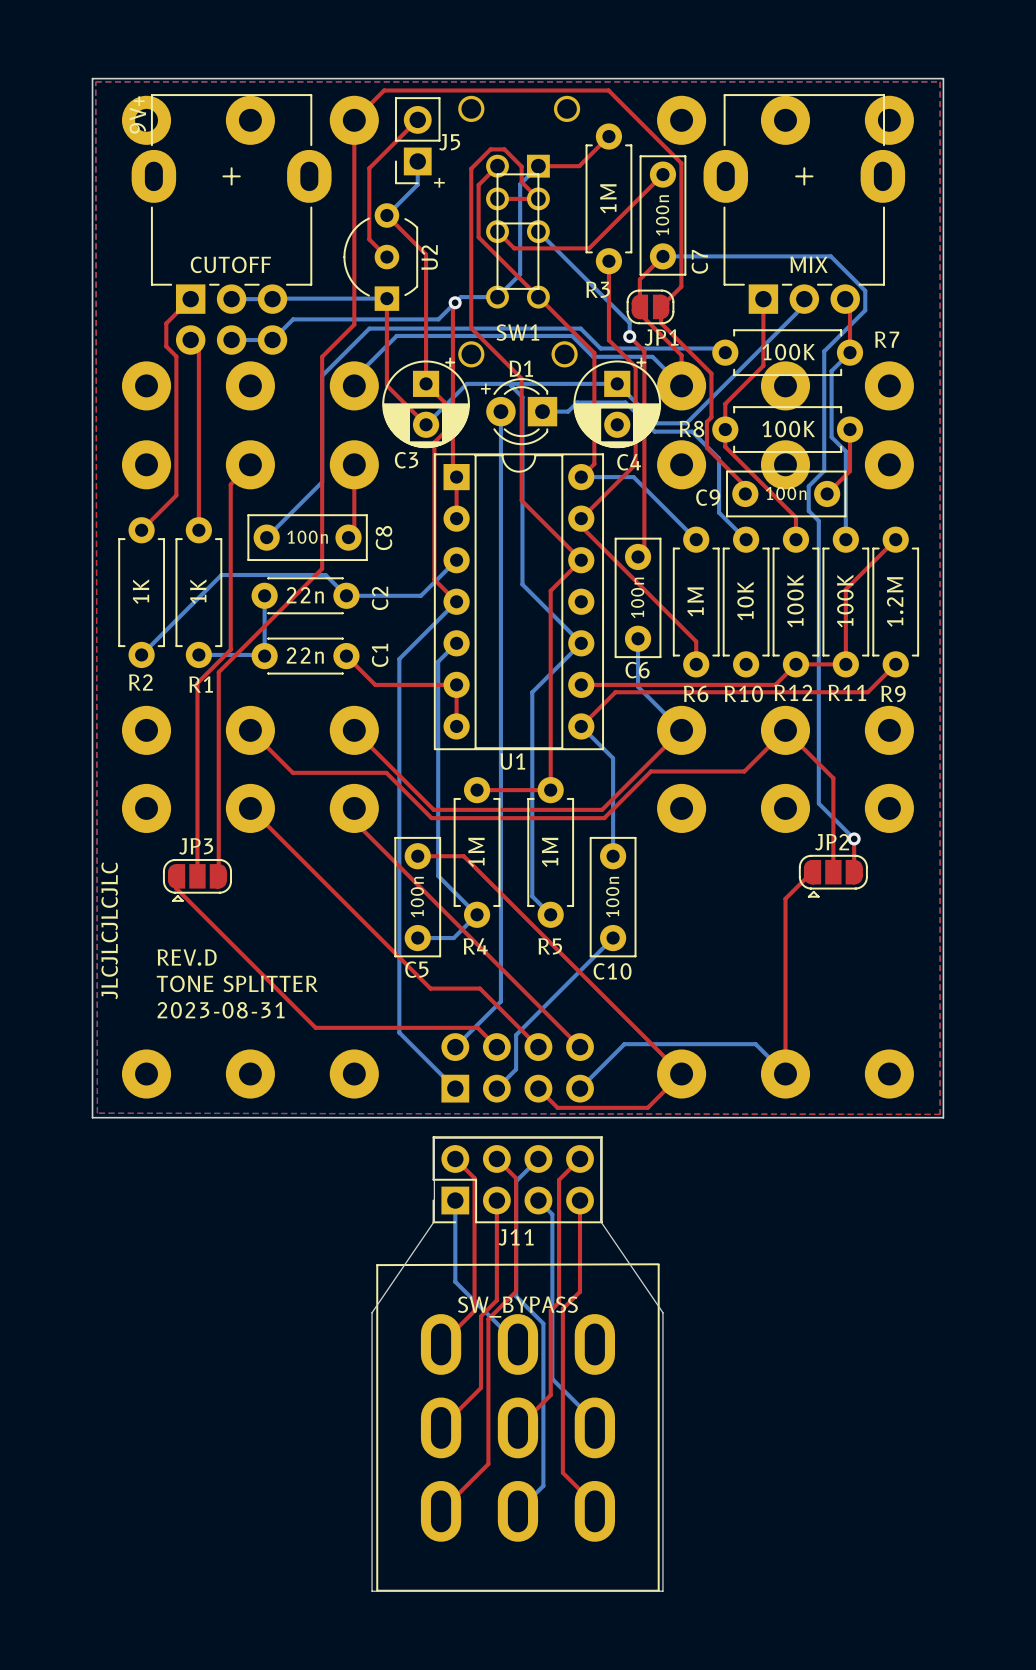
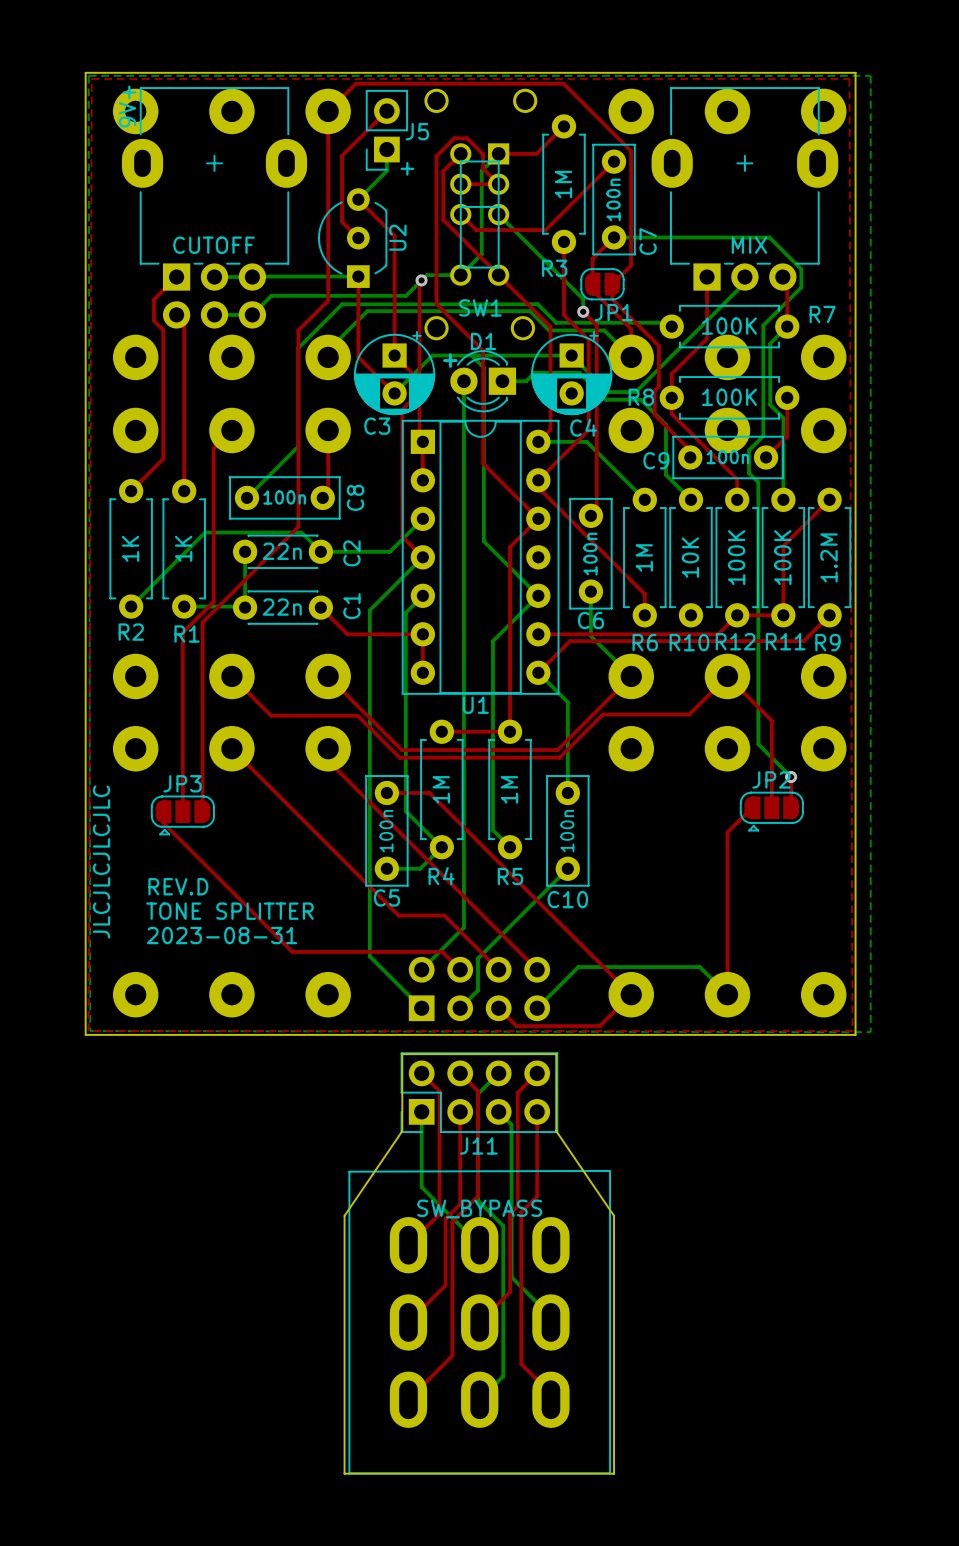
board edge: (923, 78) (943, 78) (943, 1117) (92, 1117) -> (855, 72) (855, 1034) (85, 1034)
top zone outline: (95, 81) (97, 1113) (940, 1114) (940, 81) (95, 81) -> (91, 78) (88, 1031) (852, 1031) (849, 78) (91, 78)

